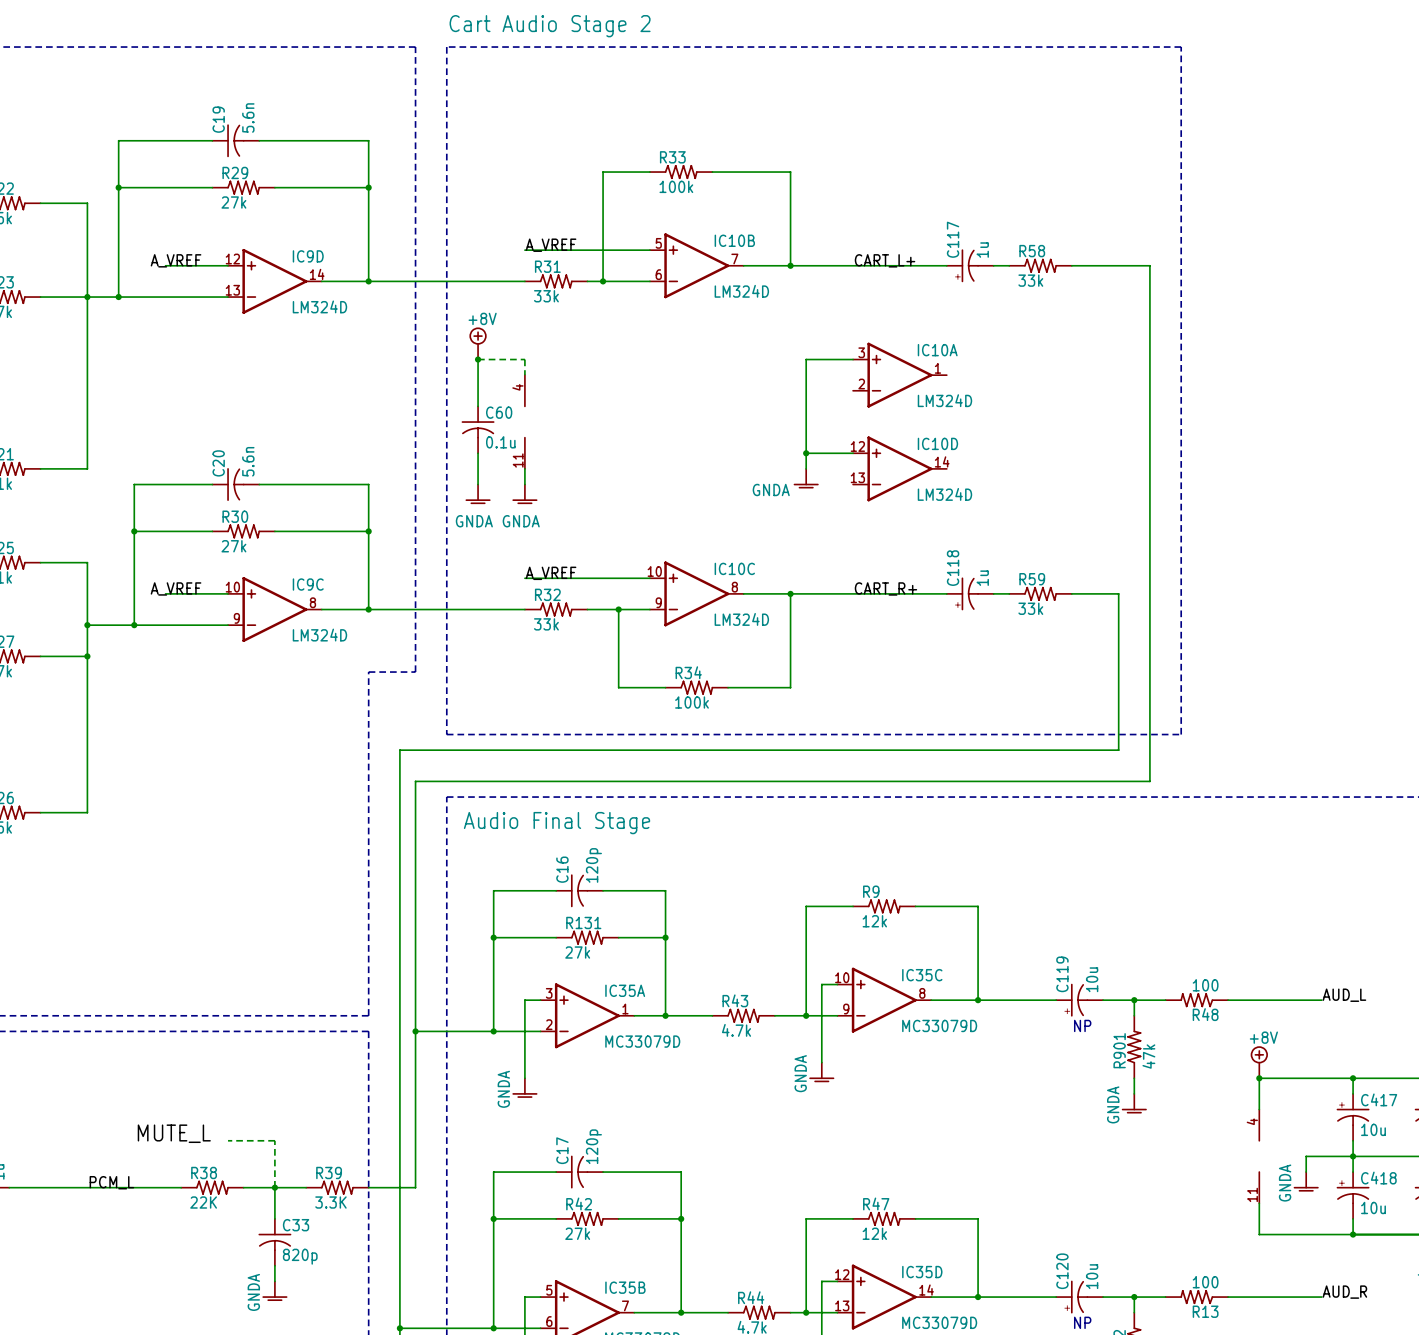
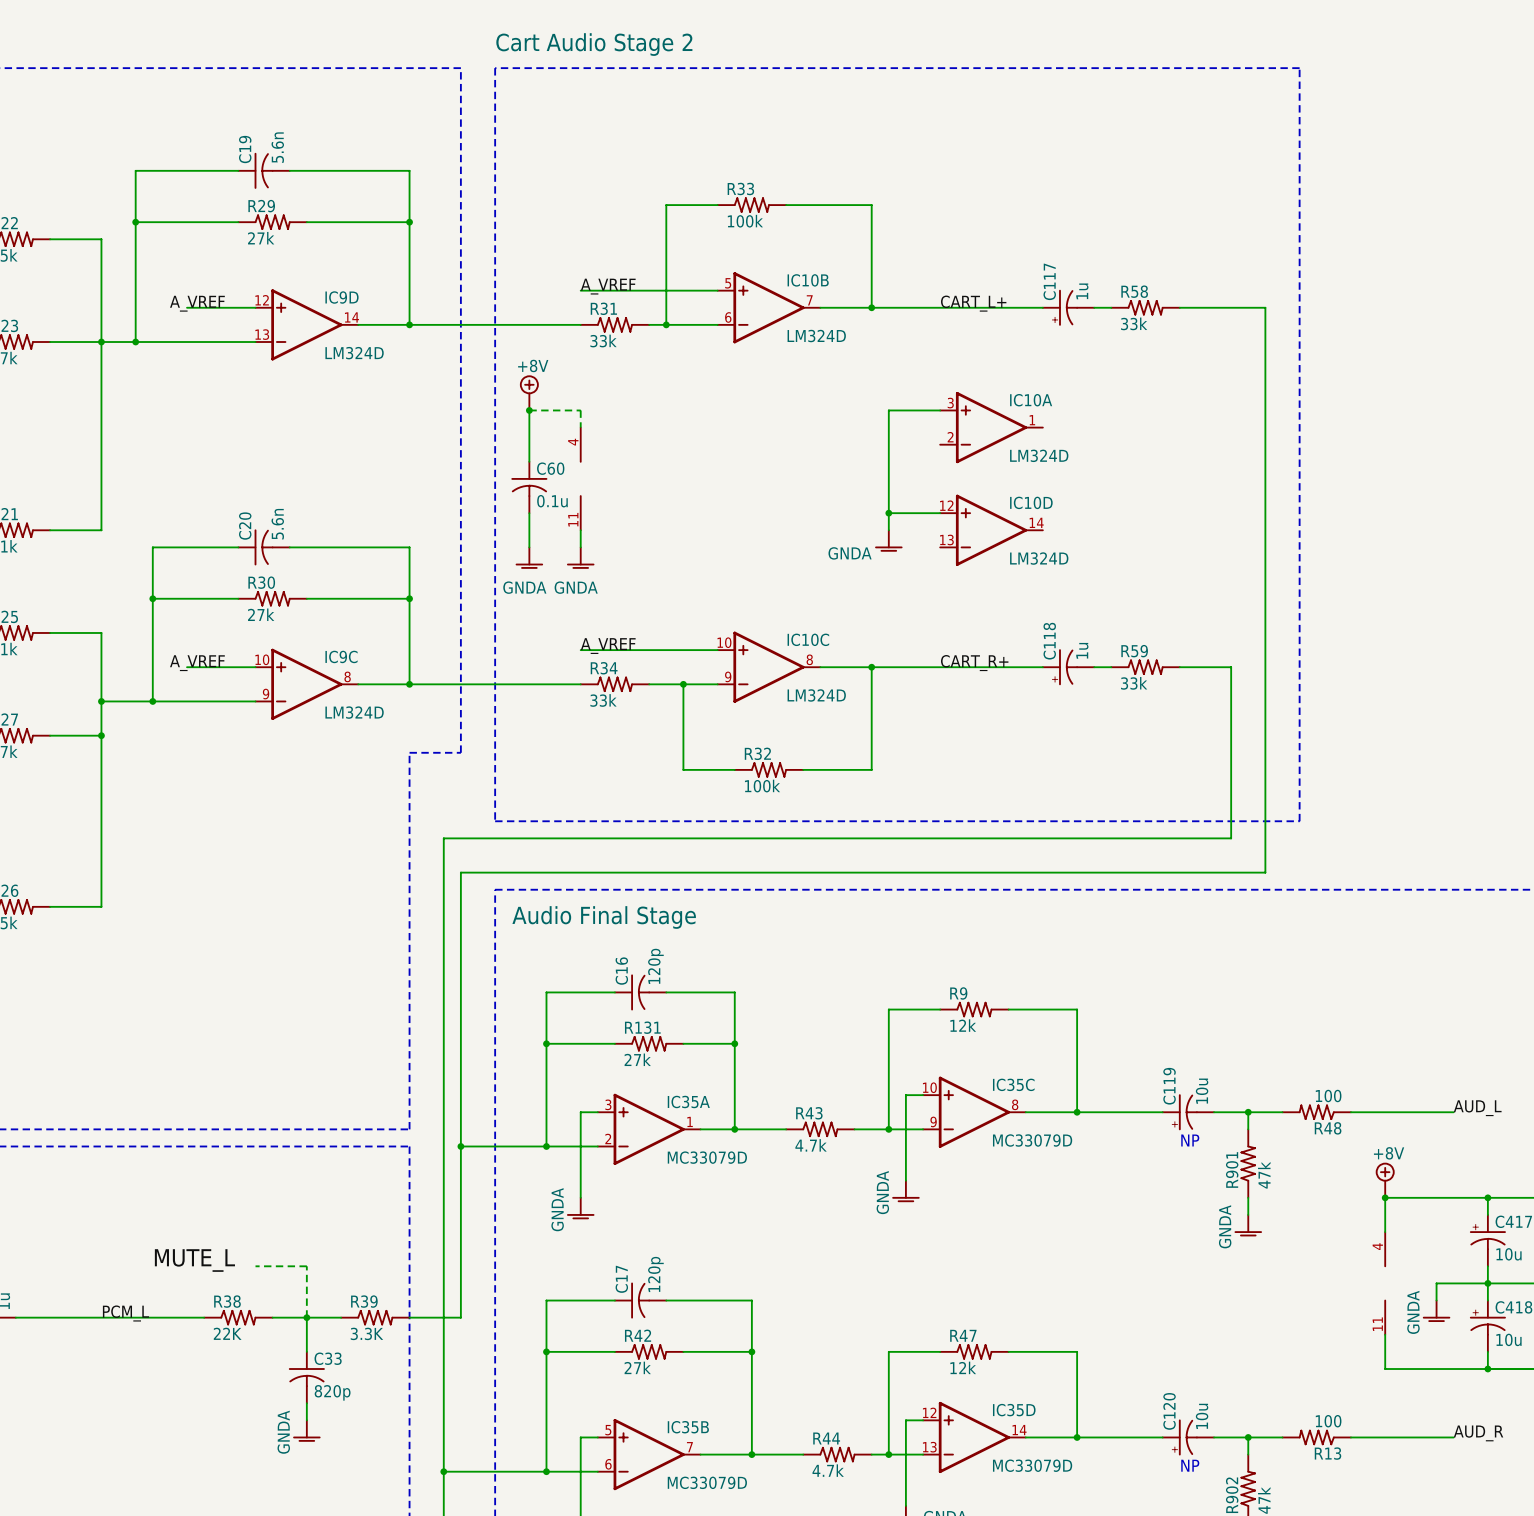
R32 name: R32 (547, 594) -> R34 (604, 668)
R34 name: R34 (688, 672) -> R32 (757, 753)

